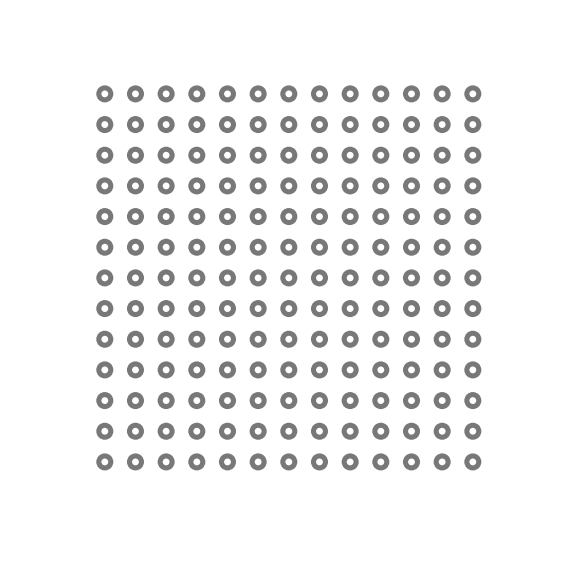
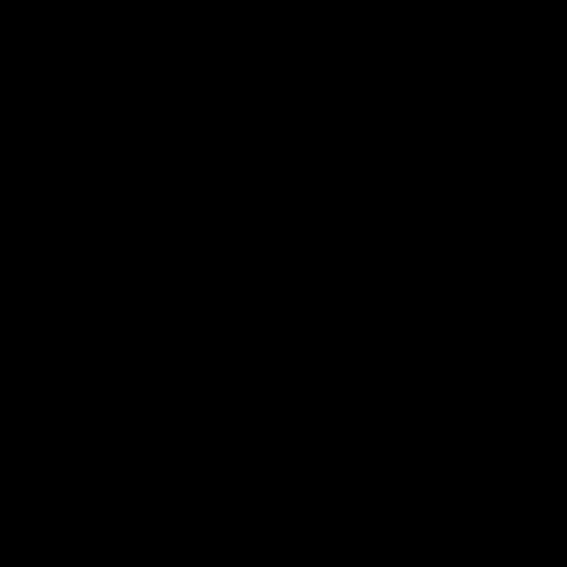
via: (104, 93) -> none
via: (135, 93) -> none
via: (166, 93) -> none
via: (196, 93) -> none
via: (227, 93) -> none
via: (258, 93) -> none
via: (288, 93) -> none
via: (319, 93) -> none
via: (350, 93) -> none
via: (380, 93) -> none
via: (411, 93) -> none
via: (442, 93) -> none
via: (472, 93) -> none
via: (104, 124) -> none
via: (135, 124) -> none
via: (166, 124) -> none
via: (196, 124) -> none
via: (227, 124) -> none
via: (258, 124) -> none
via: (288, 124) -> none
via: (319, 124) -> none
via: (350, 124) -> none
via: (380, 124) -> none
via: (411, 124) -> none
via: (442, 124) -> none
via: (472, 124) -> none
via: (104, 155) -> none
via: (135, 155) -> none
via: (166, 155) -> none
via: (196, 155) -> none
via: (227, 155) -> none
via: (258, 155) -> none
via: (288, 155) -> none
via: (319, 155) -> none
via: (350, 155) -> none
via: (380, 155) -> none
via: (411, 155) -> none
via: (442, 155) -> none
via: (472, 155) -> none
via: (104, 185) -> none
via: (135, 185) -> none
via: (166, 185) -> none
via: (196, 185) -> none
via: (227, 185) -> none
via: (258, 185) -> none
via: (288, 185) -> none
via: (319, 185) -> none
via: (350, 185) -> none
via: (380, 185) -> none
via: (411, 185) -> none
via: (442, 185) -> none
via: (472, 185) -> none
via: (104, 216) -> none
via: (135, 216) -> none
via: (166, 216) -> none
via: (196, 216) -> none
via: (227, 216) -> none
via: (258, 216) -> none
via: (288, 216) -> none
via: (319, 216) -> none
via: (350, 216) -> none
via: (380, 216) -> none
via: (411, 216) -> none
via: (442, 216) -> none
via: (472, 216) -> none
via: (104, 247) -> none
via: (135, 247) -> none
via: (166, 247) -> none
via: (196, 247) -> none
via: (227, 247) -> none
via: (258, 247) -> none
via: (288, 247) -> none
via: (319, 247) -> none
via: (350, 247) -> none
via: (380, 247) -> none
via: (411, 247) -> none
via: (442, 247) -> none
via: (472, 247) -> none
via: (104, 277) -> none
via: (135, 277) -> none
via: (166, 277) -> none
via: (196, 277) -> none
via: (227, 277) -> none
via: (258, 277) -> none
via: (288, 277) -> none
via: (319, 277) -> none
via: (350, 277) -> none
via: (380, 277) -> none
via: (411, 277) -> none
via: (442, 277) -> none
via: (472, 277) -> none
via: (104, 308) -> none
via: (135, 308) -> none
via: (166, 308) -> none
via: (196, 308) -> none
via: (227, 308) -> none
via: (258, 308) -> none
via: (288, 308) -> none
via: (319, 308) -> none
via: (350, 308) -> none
via: (380, 308) -> none
via: (411, 308) -> none
via: (442, 308) -> none
via: (472, 308) -> none
via: (104, 339) -> none
via: (135, 339) -> none
via: (166, 339) -> none
via: (196, 339) -> none
via: (227, 339) -> none
via: (258, 339) -> none
via: (288, 339) -> none
via: (319, 339) -> none
via: (350, 339) -> none
via: (380, 339) -> none
via: (411, 339) -> none
via: (442, 339) -> none
via: (472, 339) -> none
via: (104, 369) -> none
via: (135, 369) -> none
via: (166, 369) -> none
via: (196, 369) -> none
via: (227, 369) -> none
via: (258, 369) -> none
via: (288, 369) -> none
via: (319, 369) -> none
via: (350, 369) -> none
via: (380, 369) -> none
via: (411, 369) -> none
via: (442, 369) -> none
via: (472, 369) -> none
via: (104, 400) -> none
via: (135, 400) -> none
via: (166, 400) -> none
via: (196, 400) -> none
via: (227, 400) -> none
via: (258, 400) -> none
via: (288, 400) -> none
via: (319, 400) -> none
via: (350, 400) -> none
via: (380, 400) -> none
via: (411, 400) -> none
via: (442, 400) -> none
via: (472, 400) -> none
via: (104, 431) -> none
via: (135, 431) -> none
via: (166, 431) -> none
via: (196, 431) -> none
via: (227, 431) -> none
via: (258, 431) -> none
via: (288, 431) -> none
via: (319, 431) -> none
via: (350, 431) -> none
via: (380, 431) -> none
via: (411, 431) -> none
via: (442, 431) -> none
via: (472, 431) -> none
via: (104, 461) -> none
via: (135, 461) -> none
via: (166, 461) -> none
via: (196, 461) -> none
via: (227, 461) -> none
via: (258, 461) -> none
via: (288, 461) -> none
via: (319, 461) -> none
via: (350, 461) -> none
via: (380, 461) -> none
via: (411, 461) -> none
via: (442, 461) -> none
via: (472, 461) -> none

